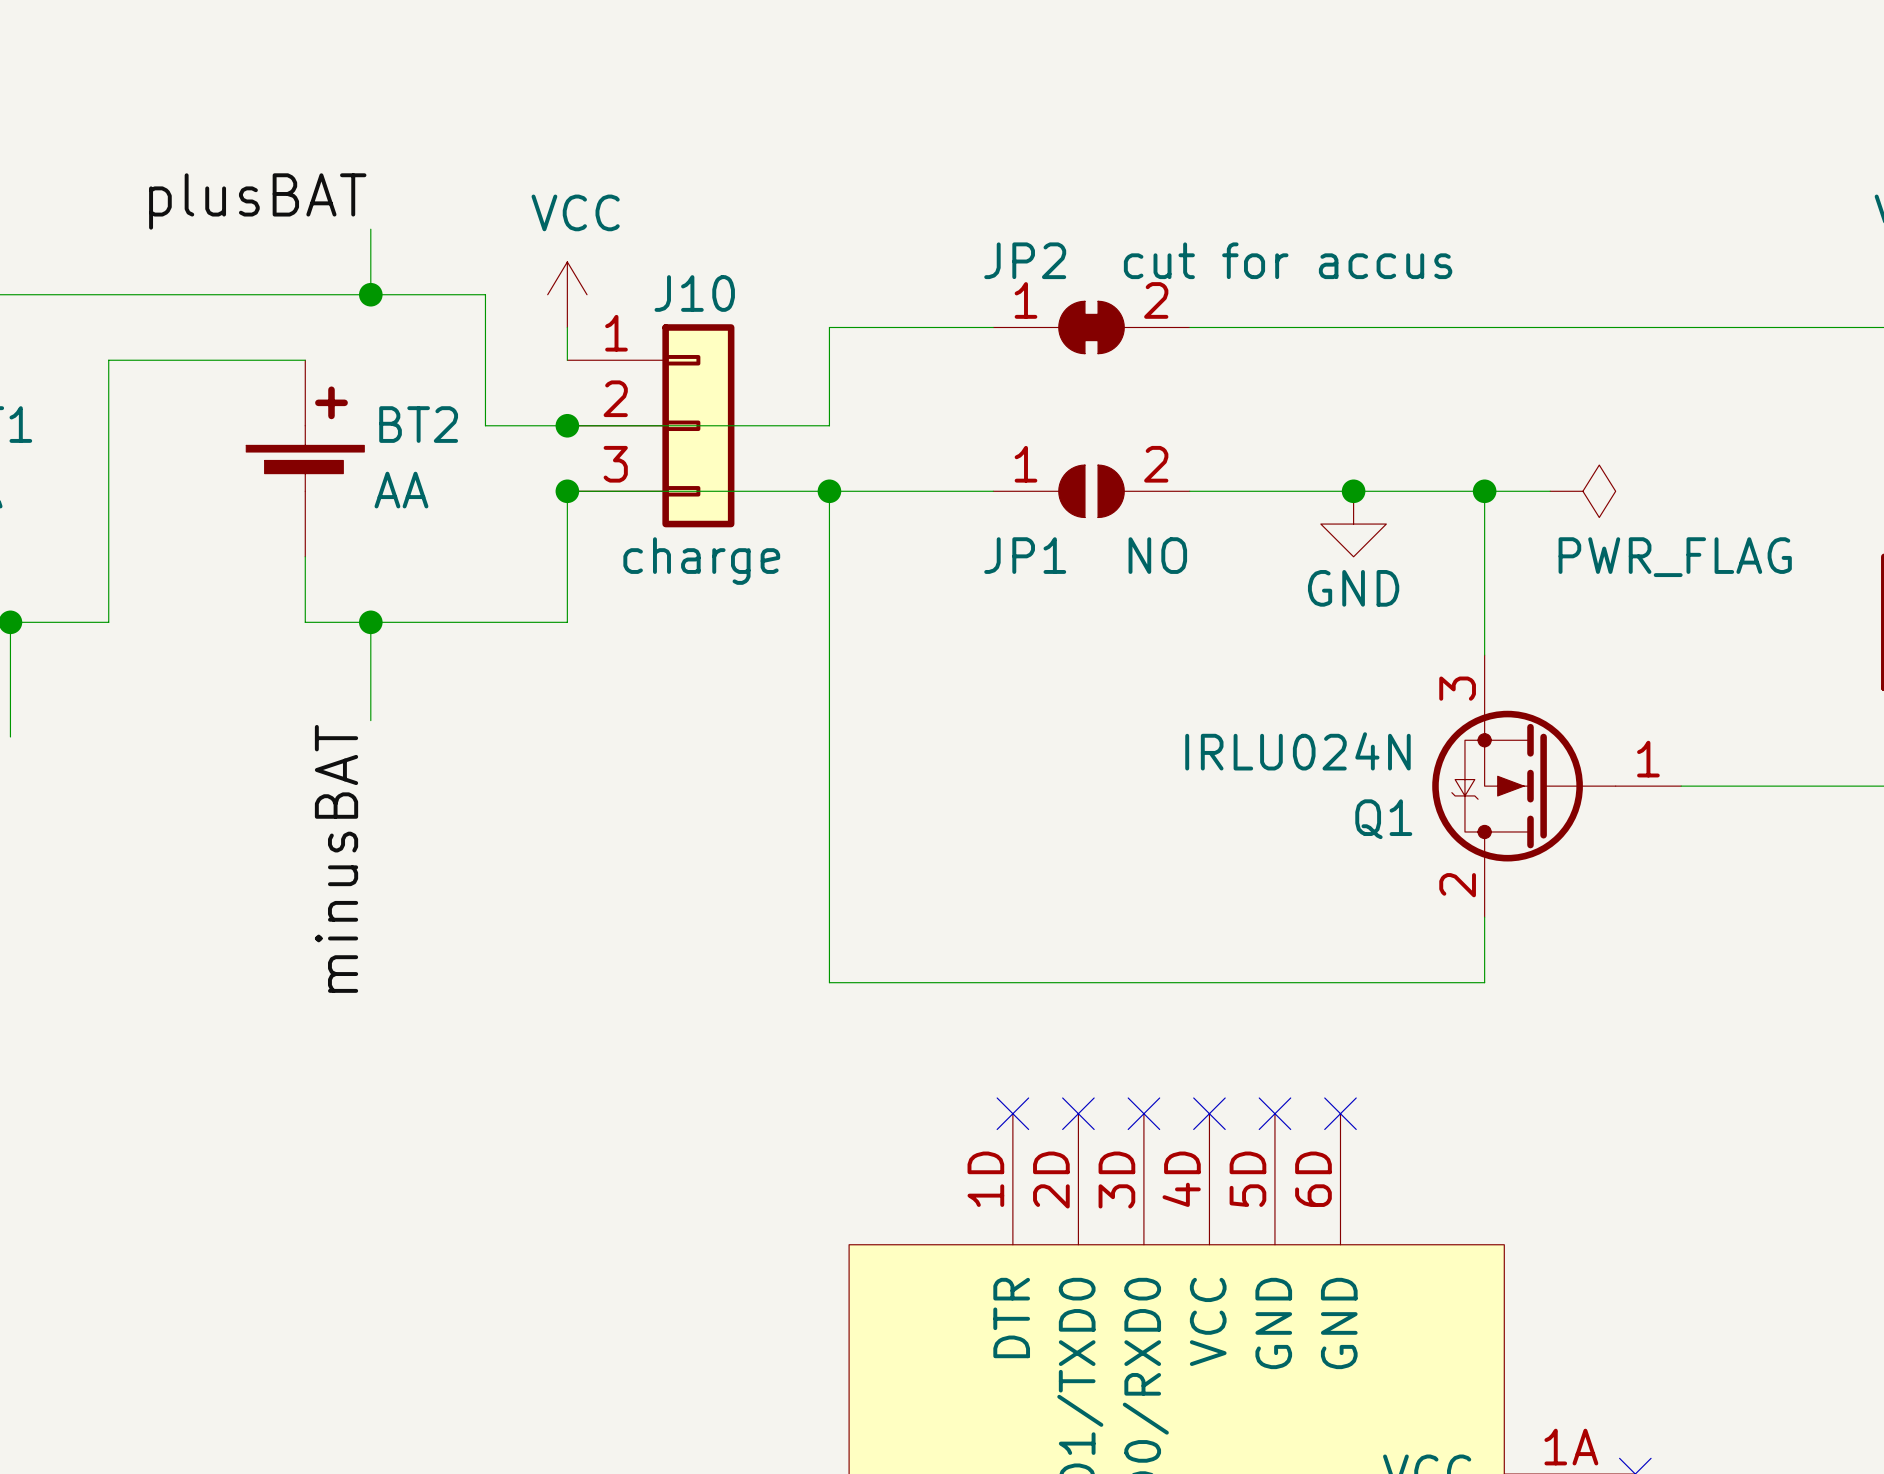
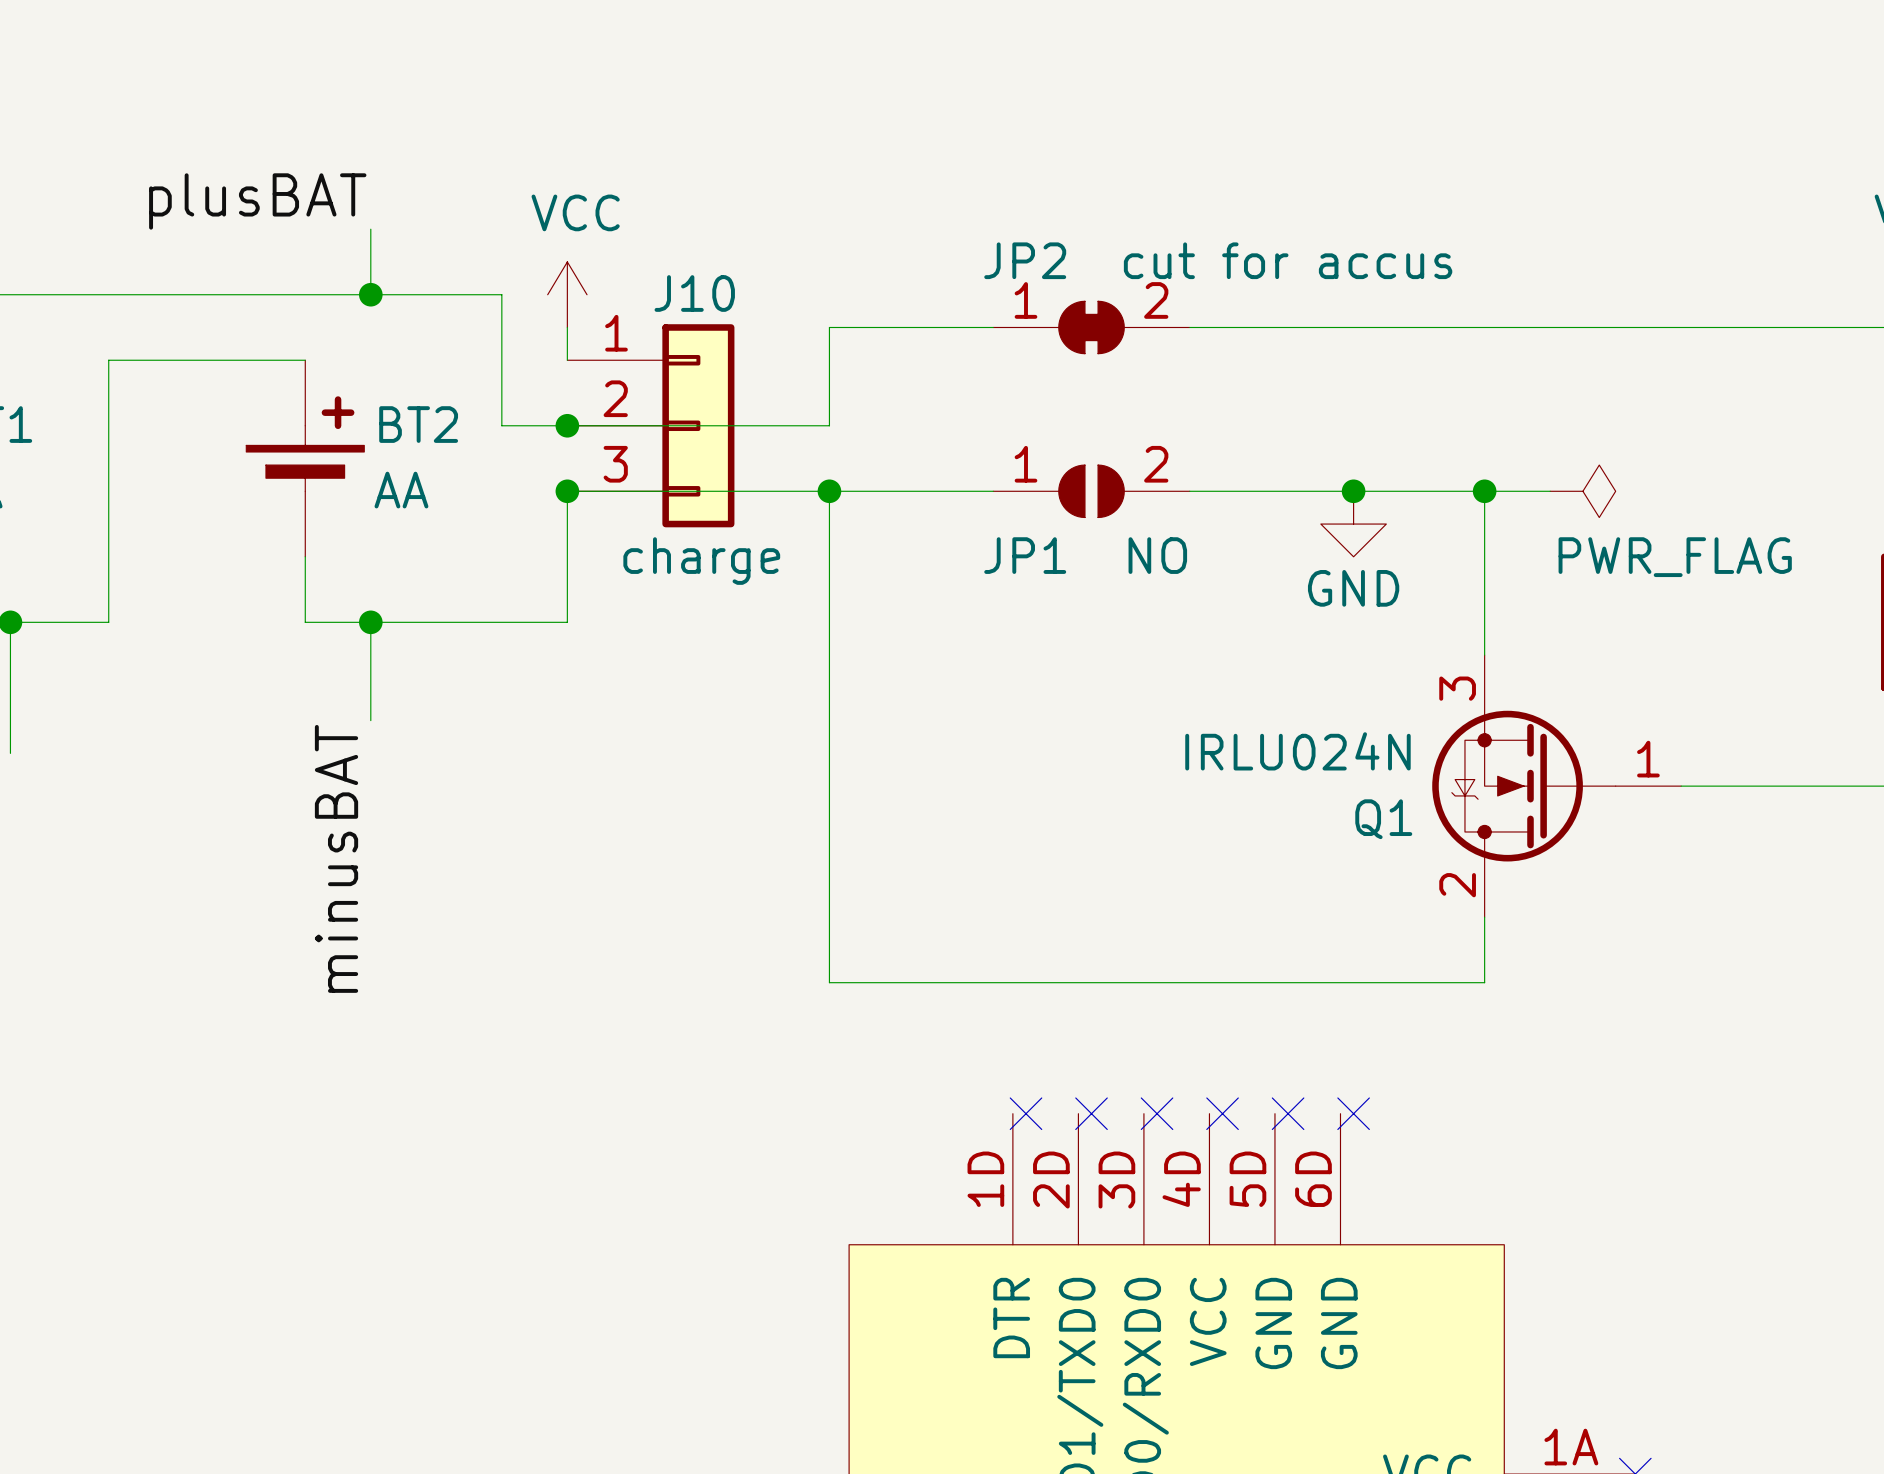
wire: (485, 294) (485, 425) (501, 425) -> (485, 294) (501, 294) (501, 425)
BT2 symbol: [246, 360, 365, 557] -> [246, 360, 365, 557]
wire: none -> (10, 736) (10, 753)
no-connect mark position: (1012, 1113) -> (1025, 1113)
no-connect mark position: (1078, 1113) -> (1091, 1113)
no-connect mark position: (1143, 1113) -> (1157, 1113)
no-connect mark position: (1209, 1113) -> (1222, 1113)
no-connect mark position: (1274, 1113) -> (1288, 1113)
no-connect mark position: (1340, 1113) -> (1353, 1113)

